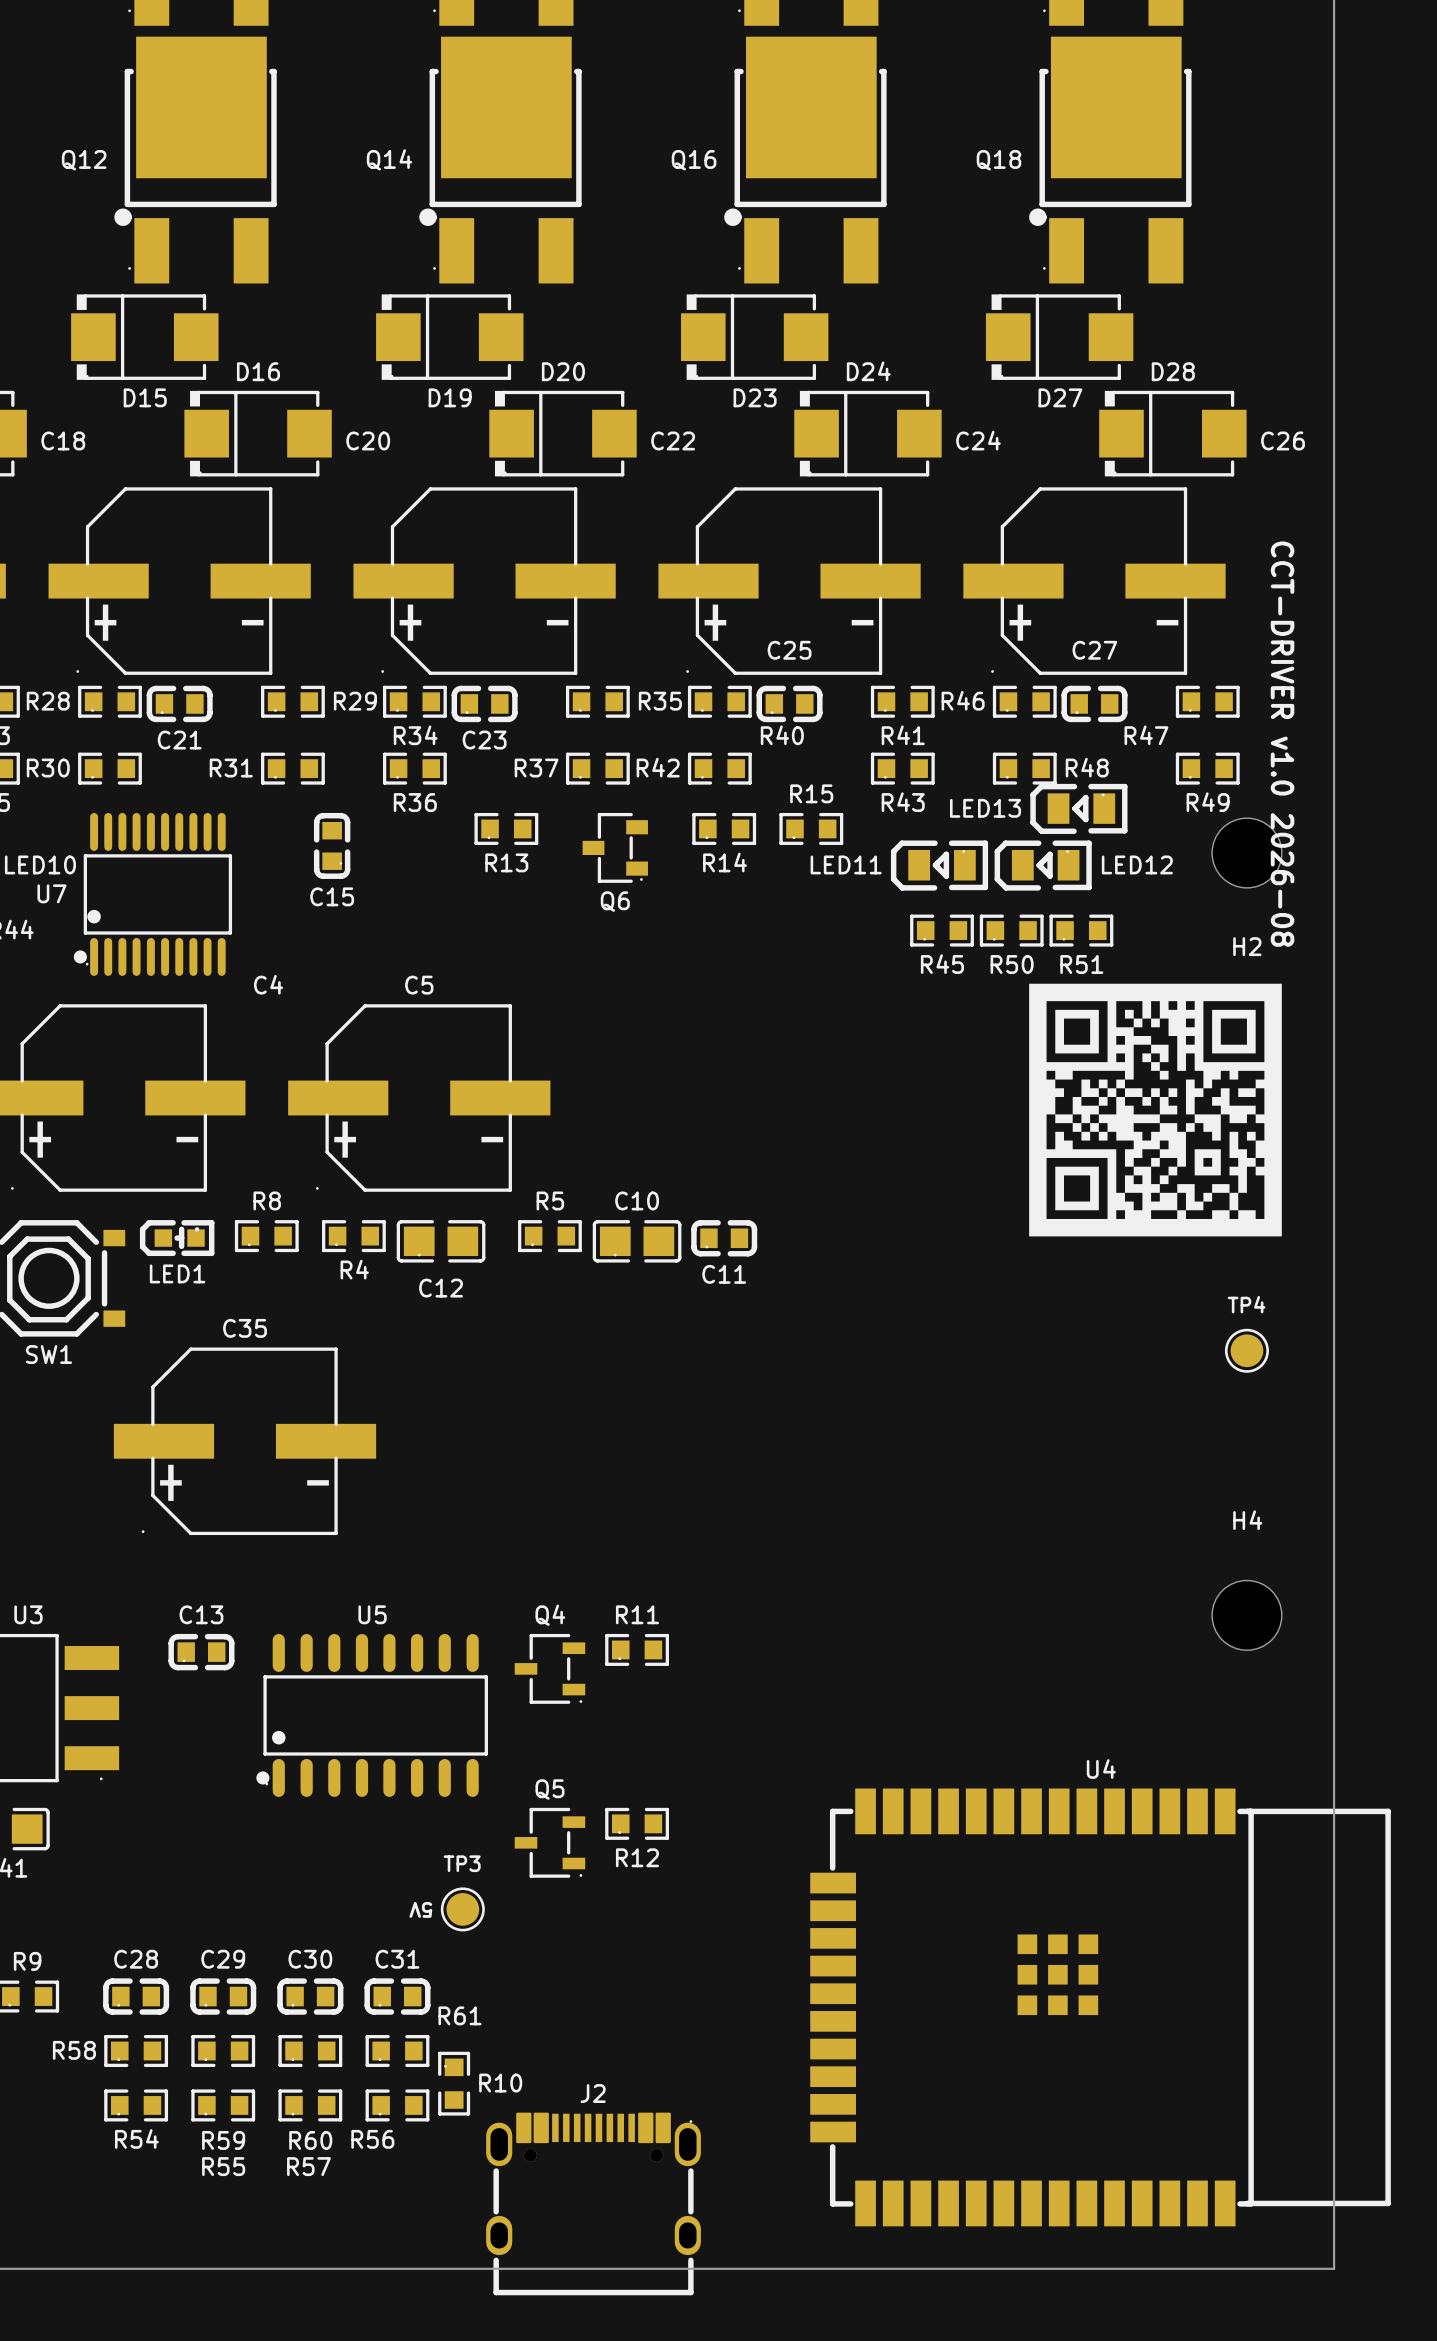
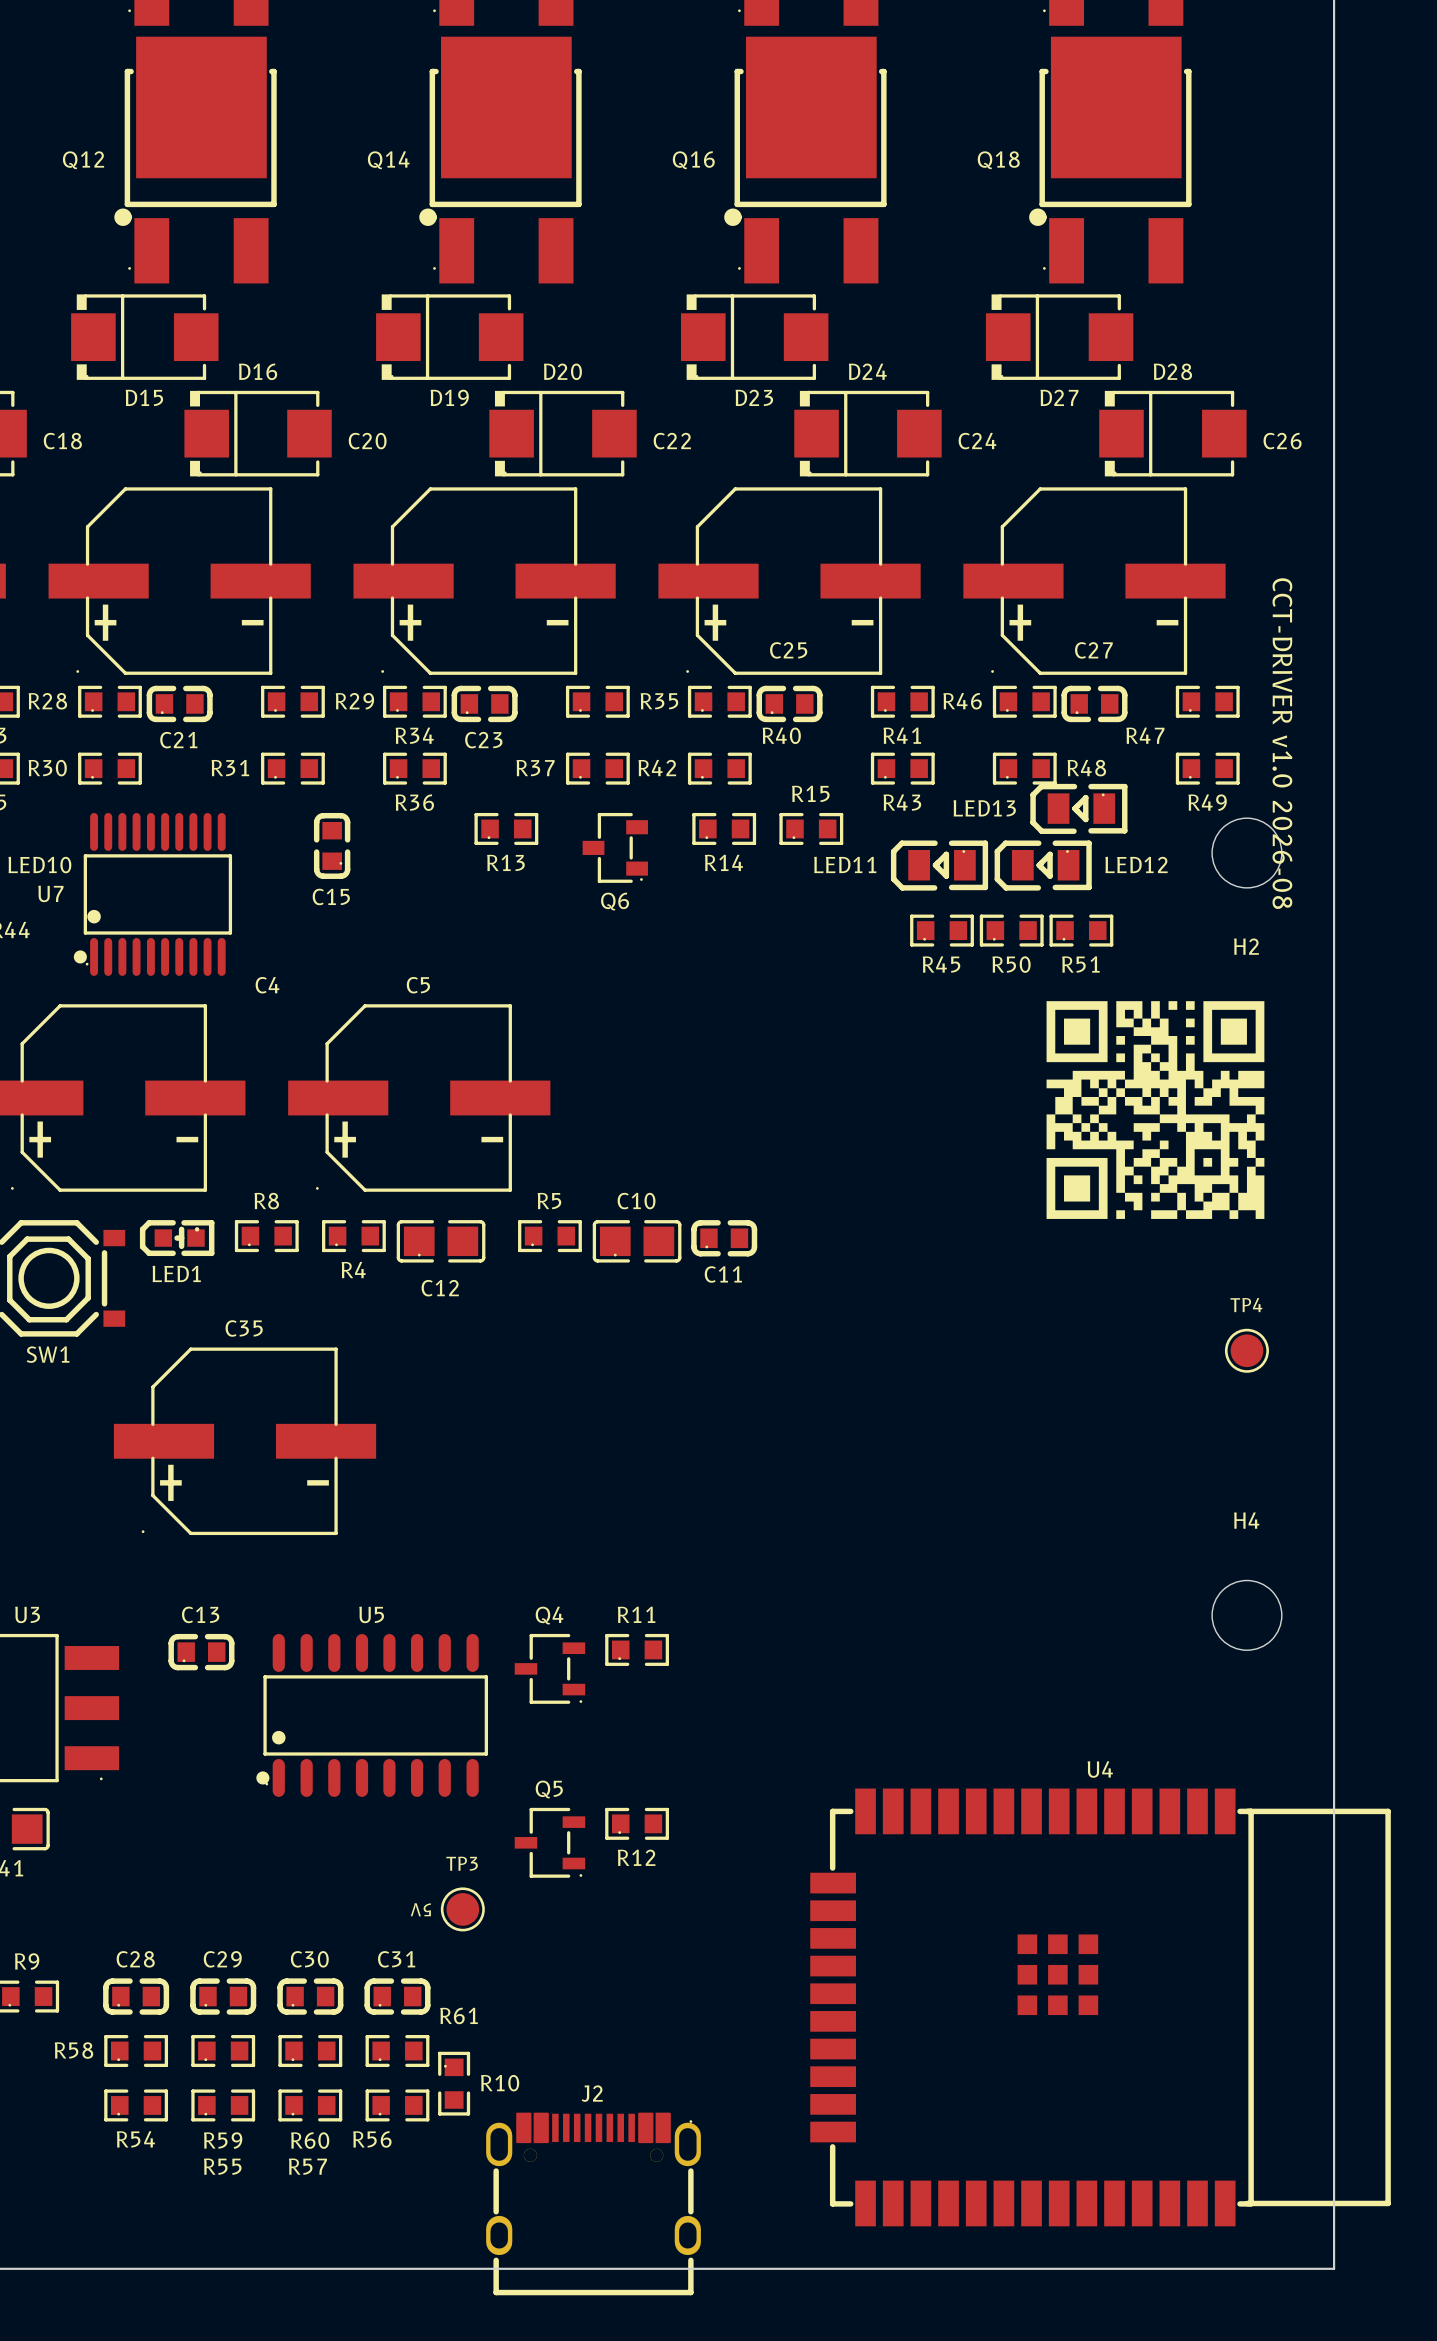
drawing: [1029, 983, 1282, 1237] -> none
drawing: none -> [1046, 1001, 1265, 1219]
drawing position: (1238, 1110) -> (1246, 1101)
drawing position: (1168, 1136) -> (1177, 1118)

